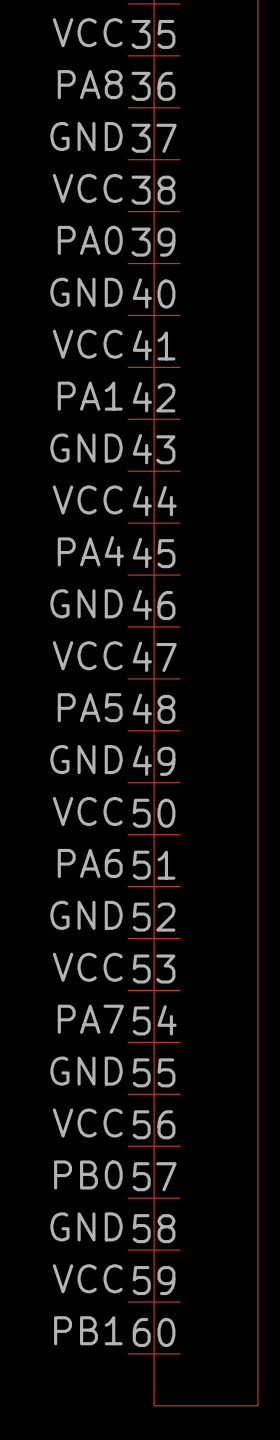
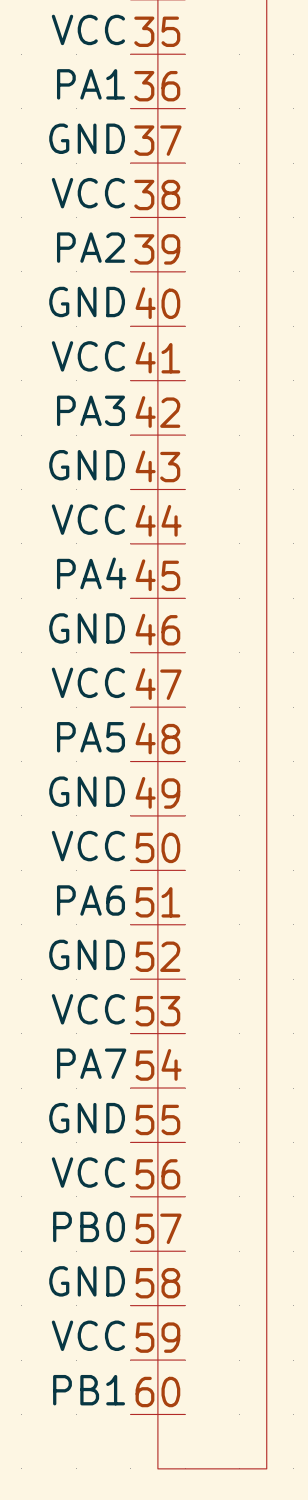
label: PA8 (90, 84) -> PA1 (90, 84)
label: PA0 (90, 240) -> PA2 (90, 247)
label: PA1 (90, 396) -> PA3 (90, 410)

